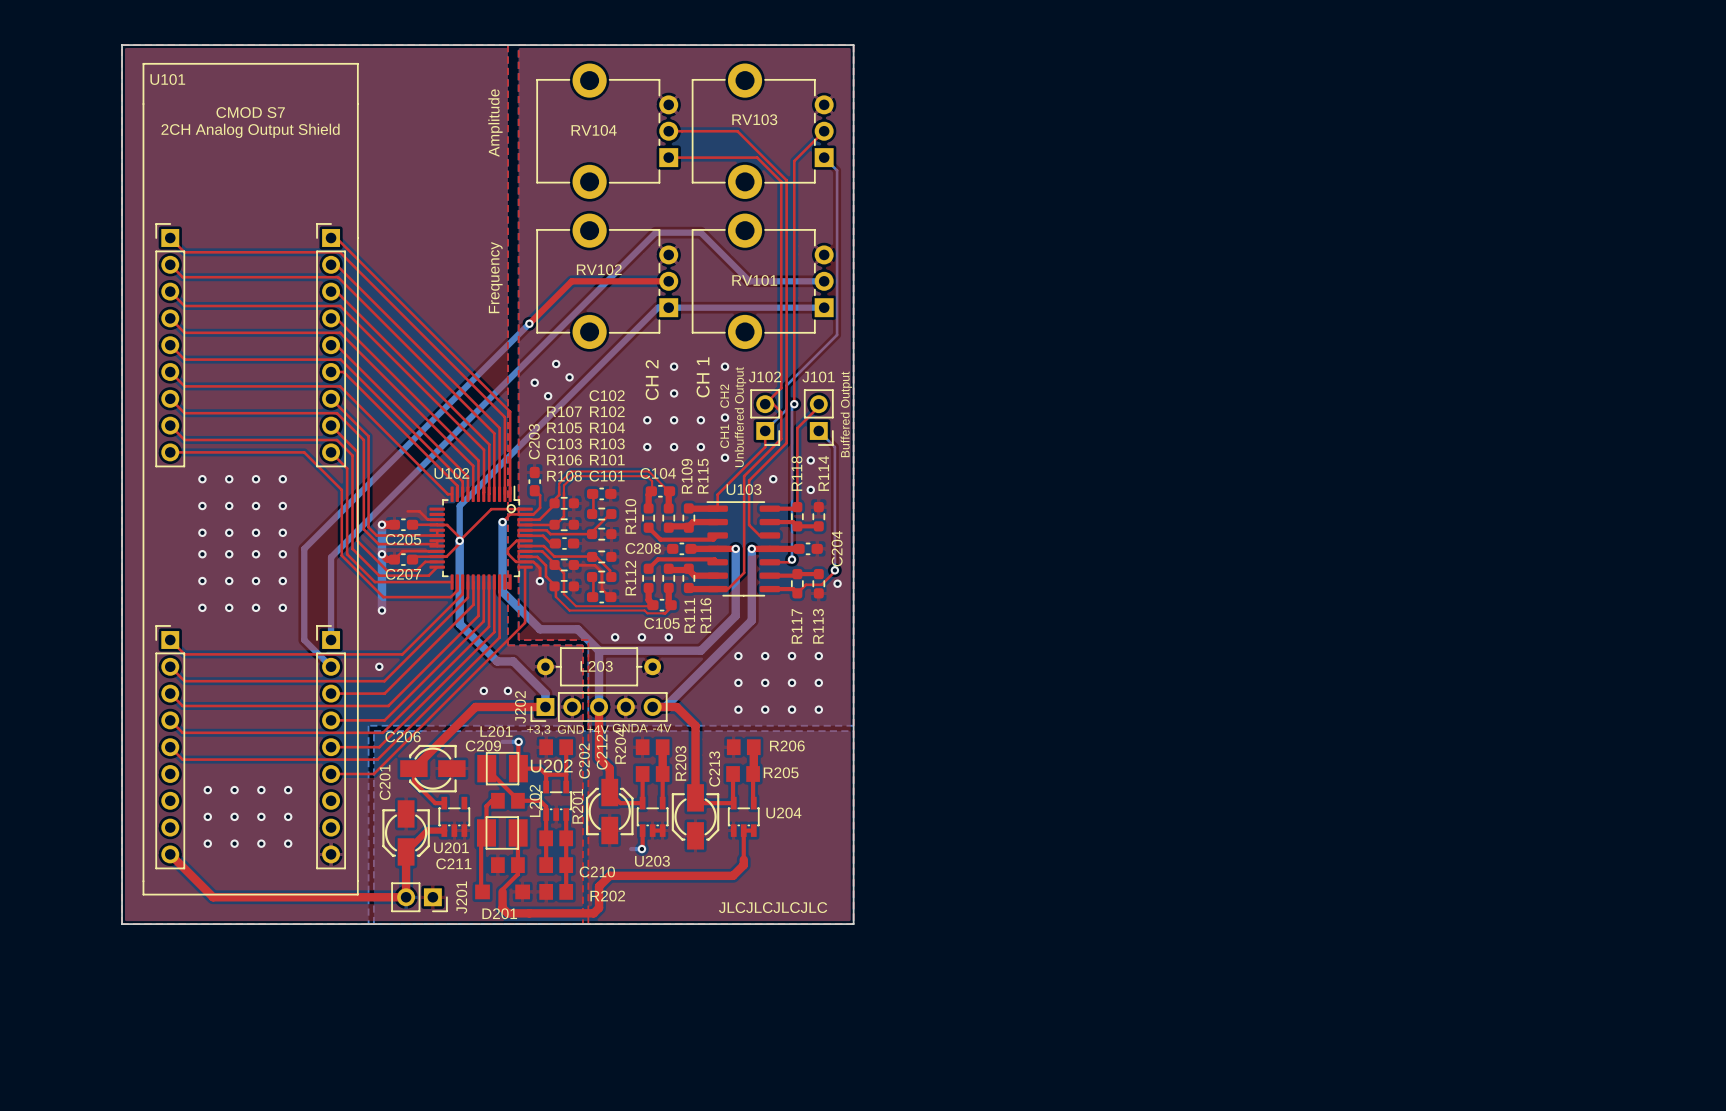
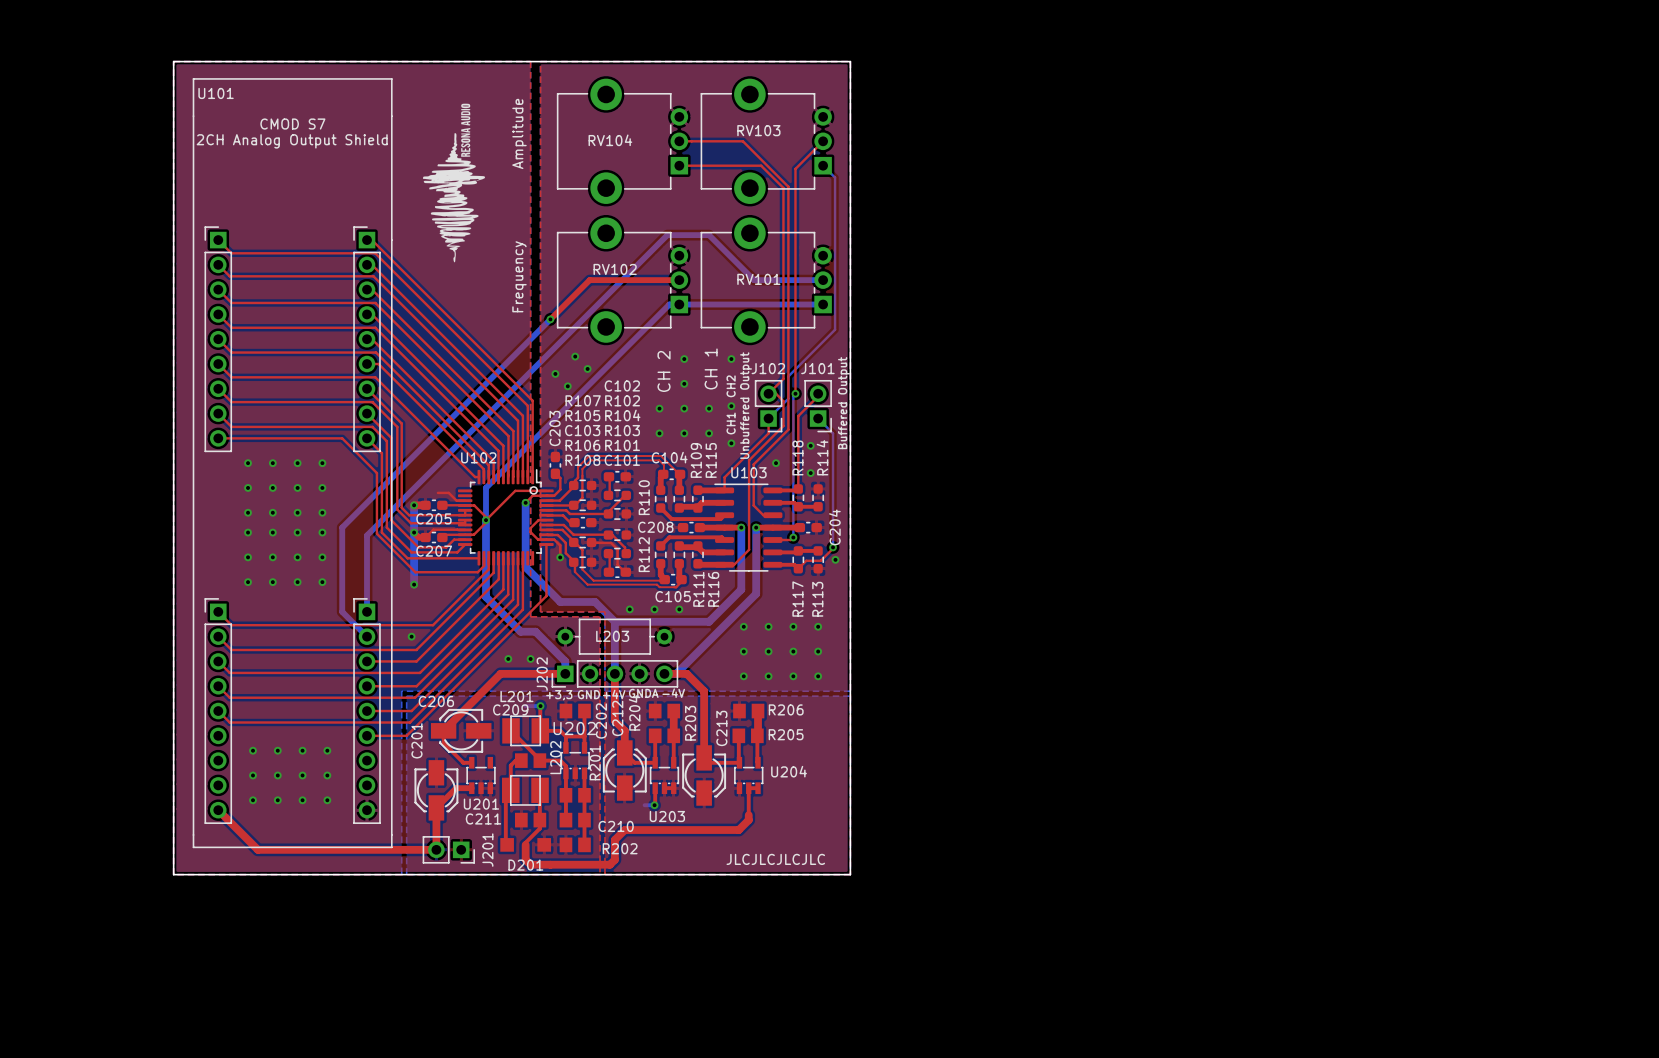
drawing: none -> [422, 103, 486, 263]

